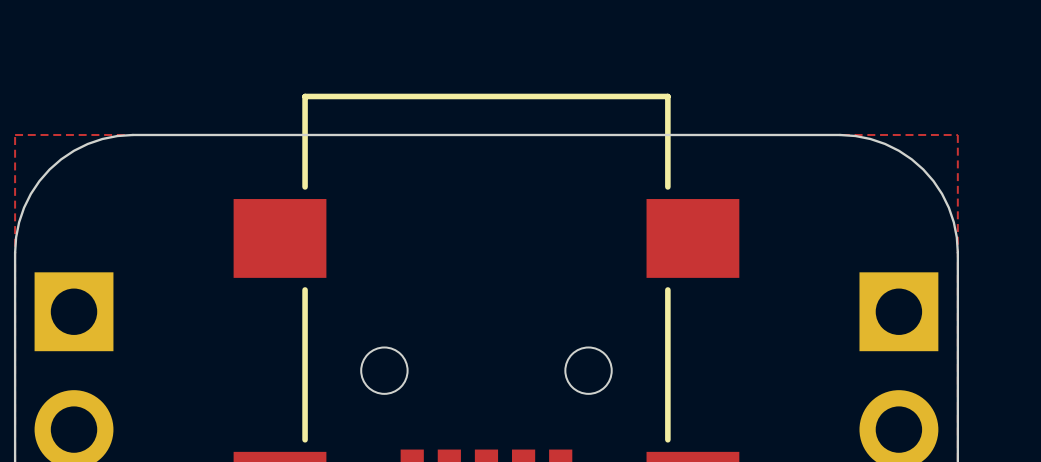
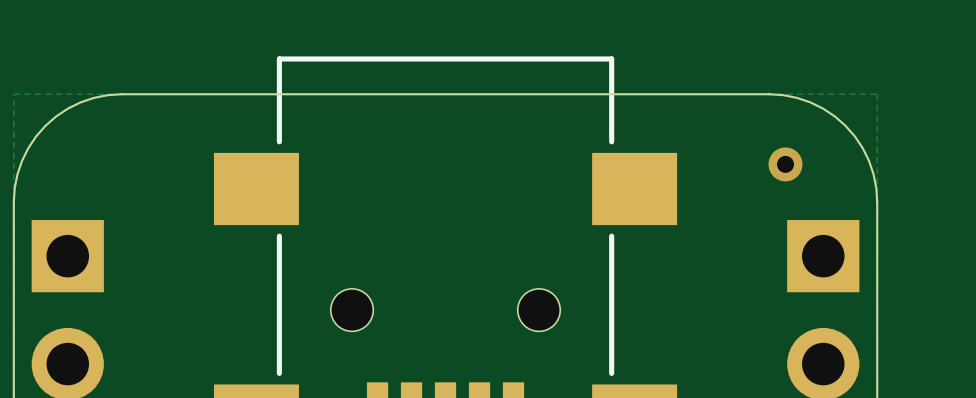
via: none -> (785, 164)

